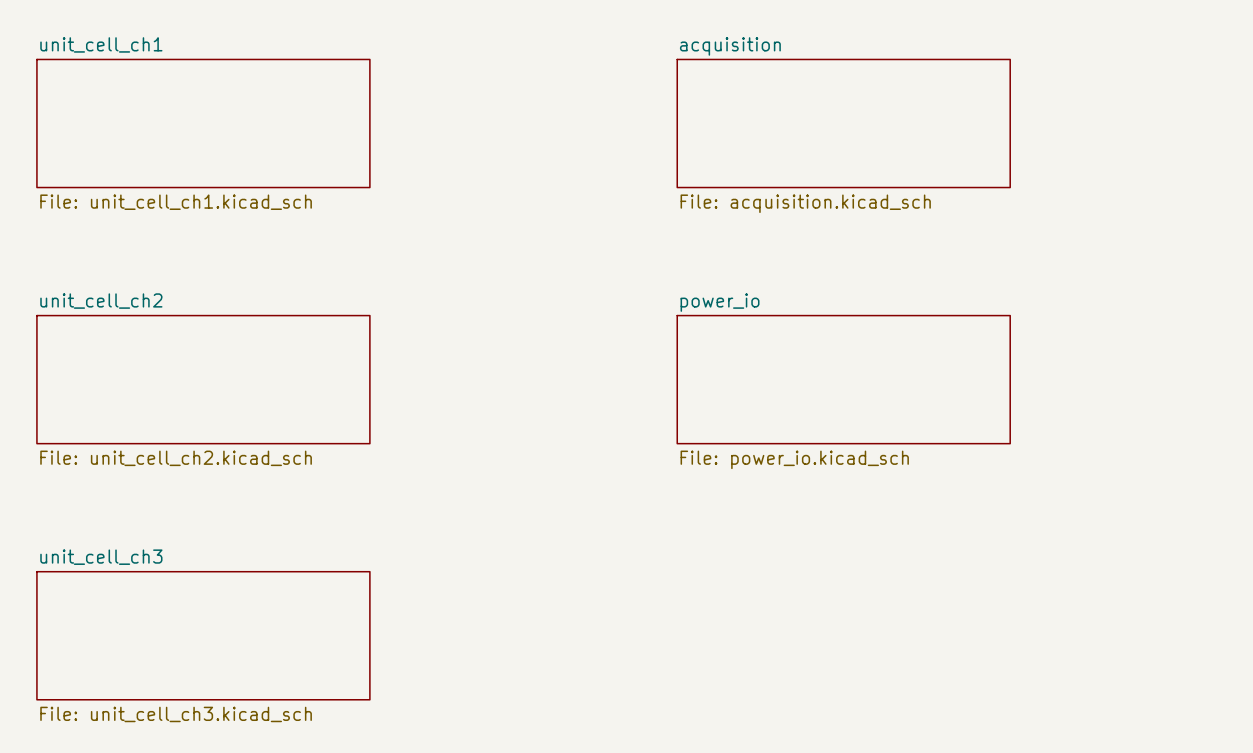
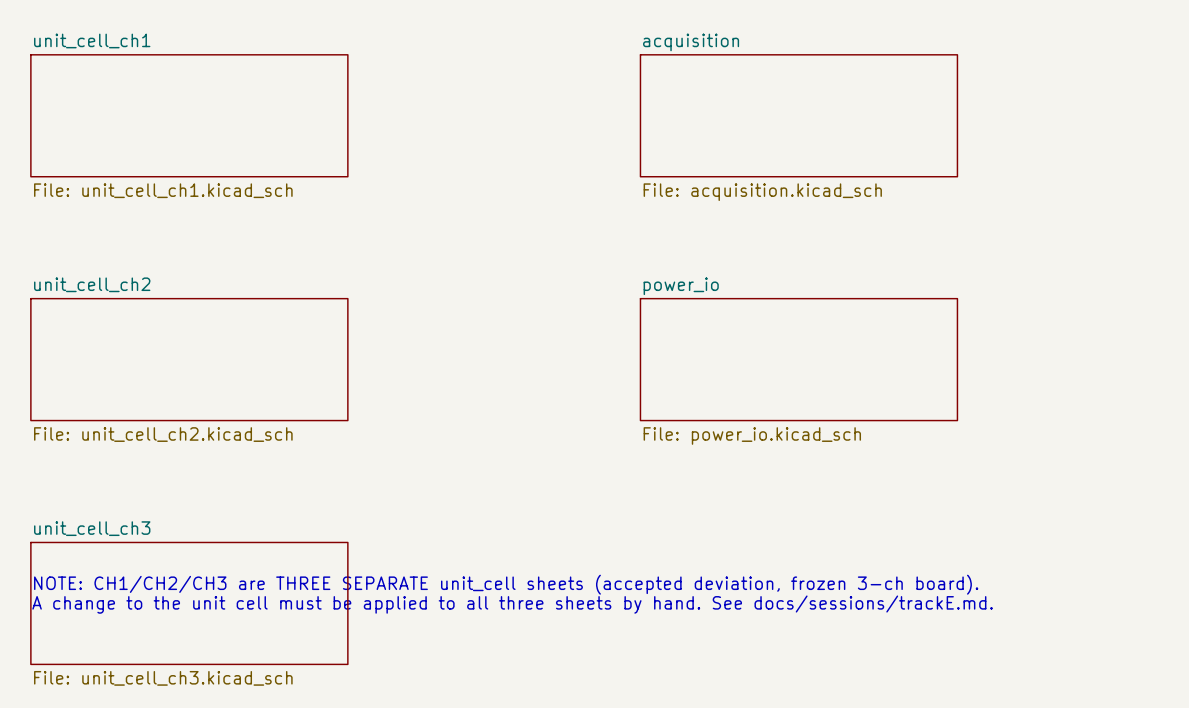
text: none -> NOTE: CH1/CH2/CH3 are THREE SEPARATE unit_cell sheets (accepted deviation, frozen 3-ch board). (506, 584)
text: none -> A change to the unit cell must be applied to all three sheets by hand. See docs/sessions/trackE.md. (512, 604)

